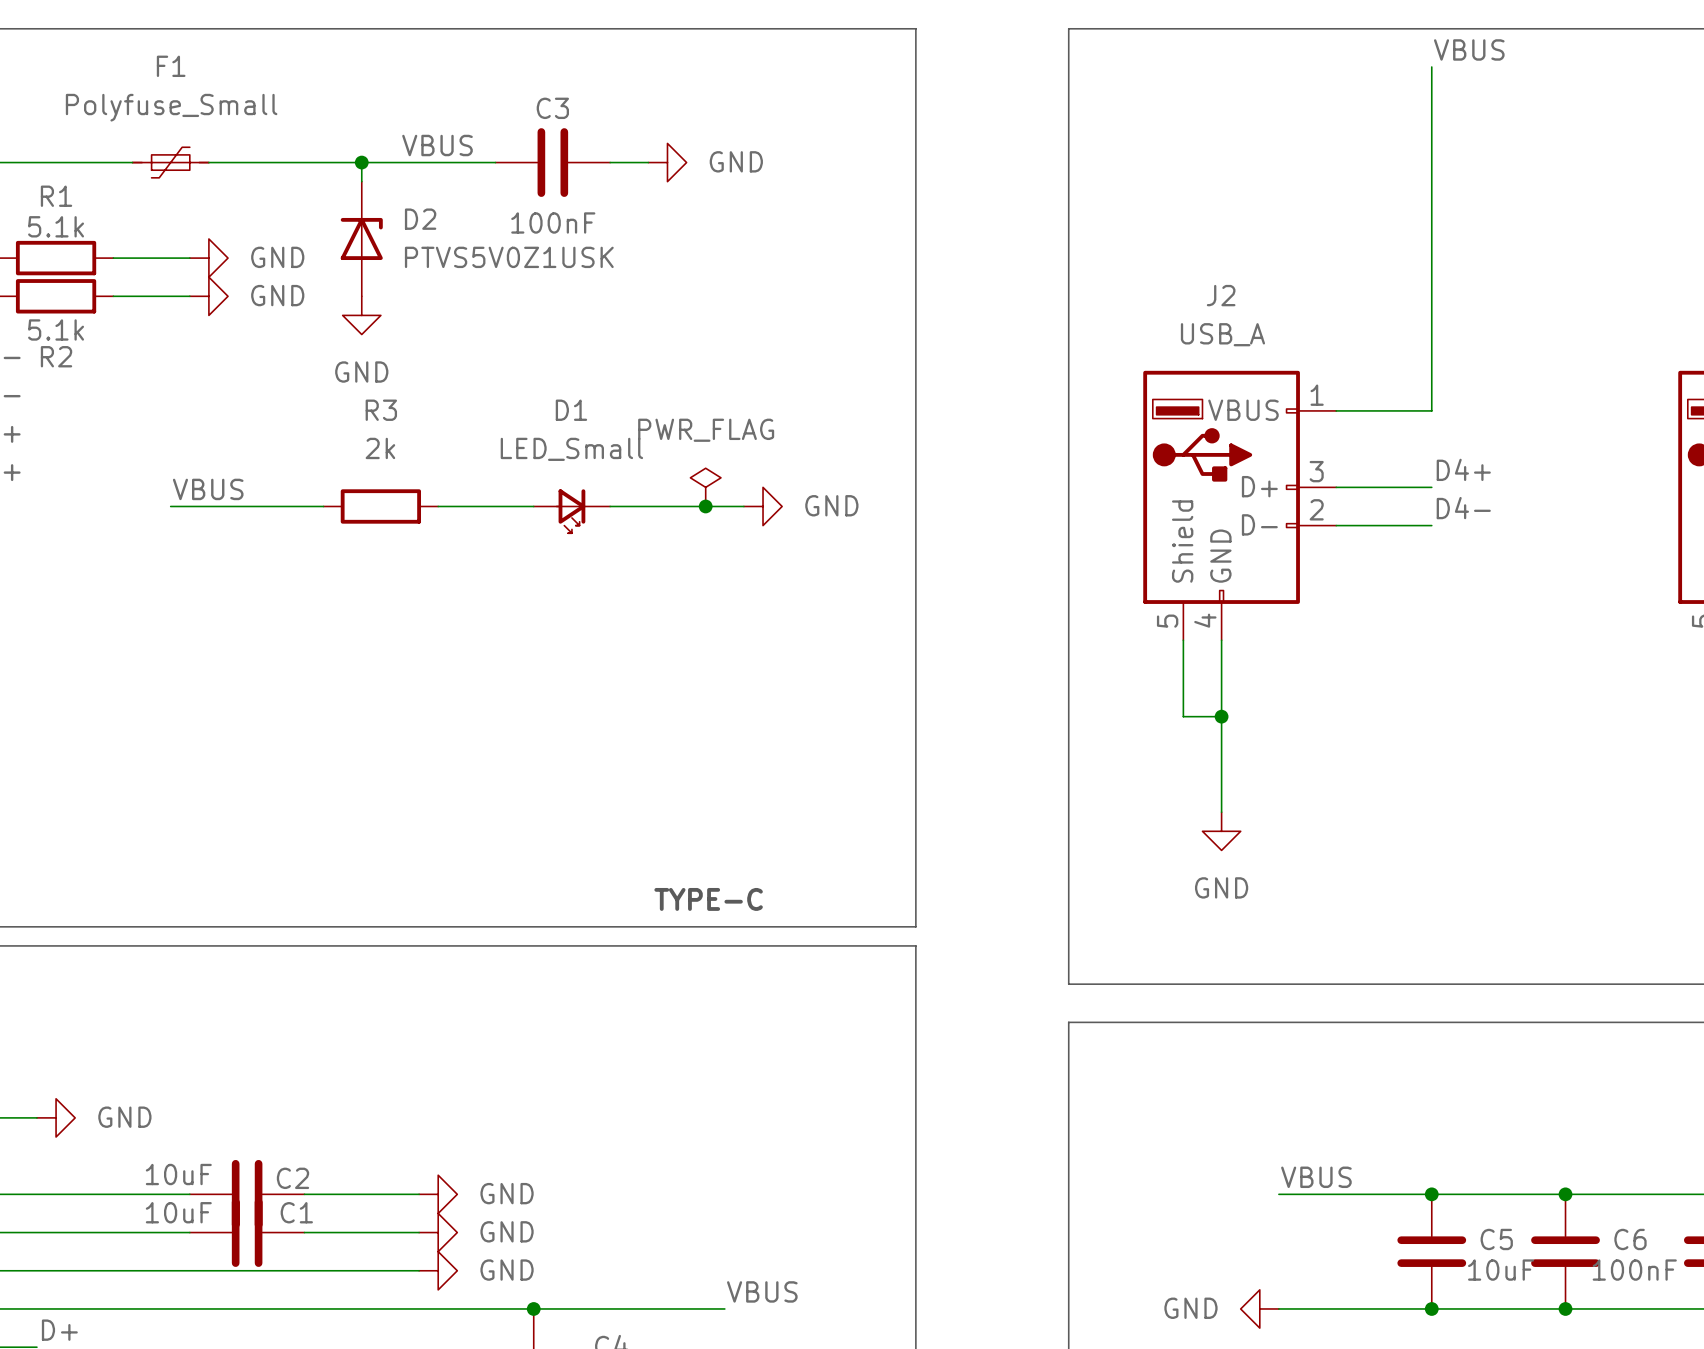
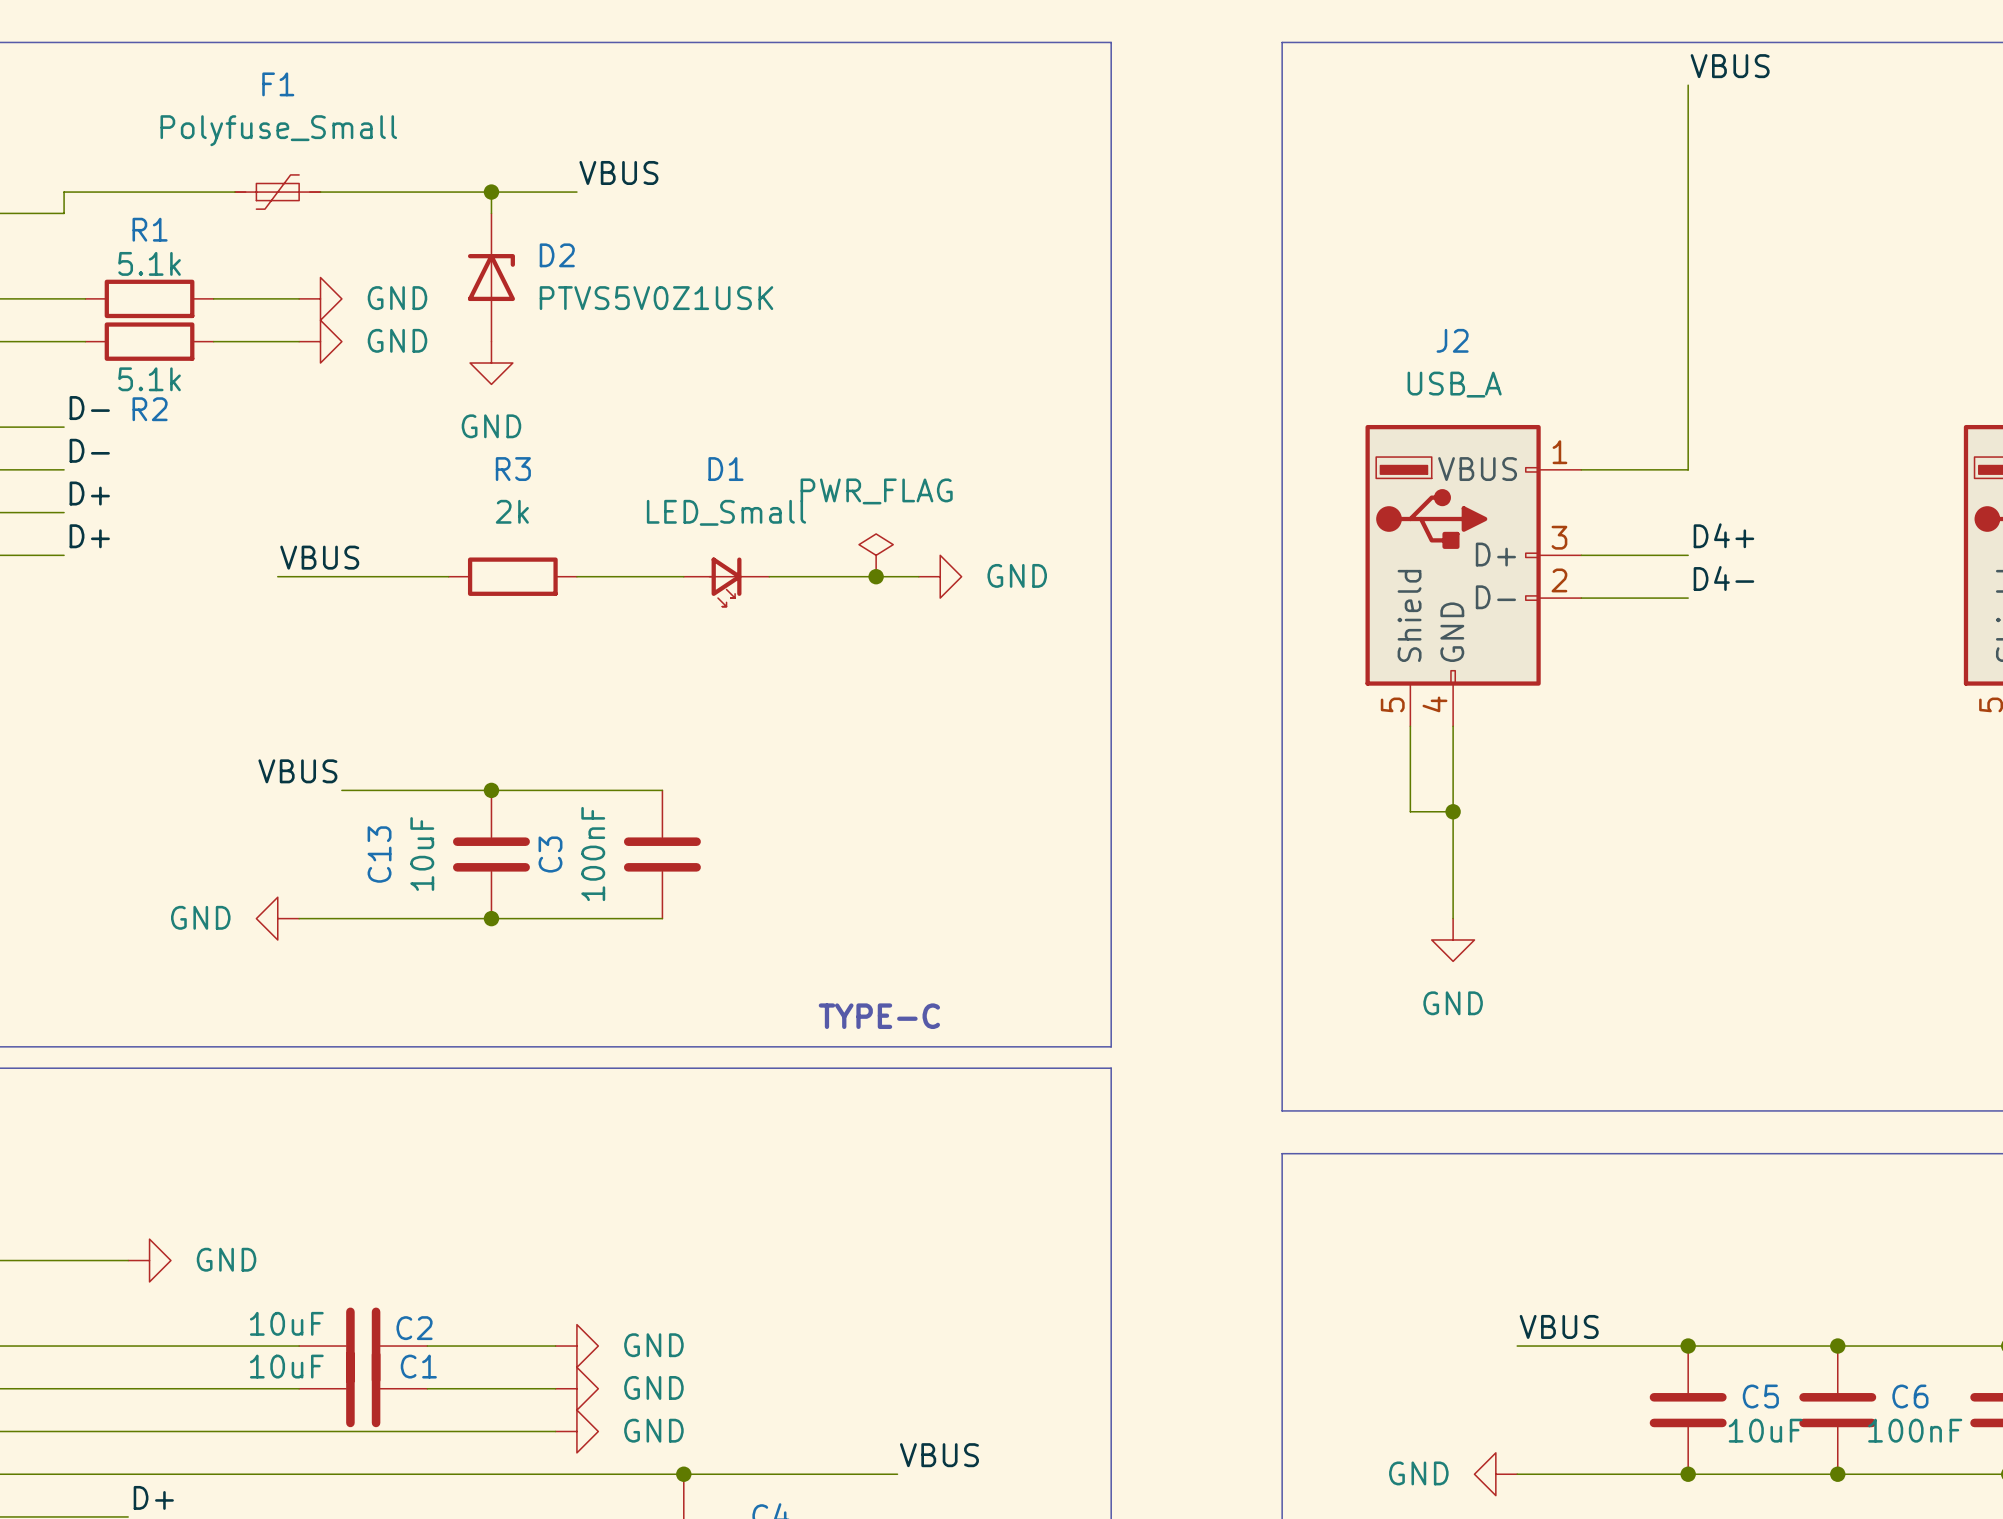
C3 name position: C3 (552, 108) -> C3 (550, 854)
label position: VBUS (437, 145) -> VBUS (618, 172)
wire: (438, 162) (495, 162) -> none
C3 rotation: 0° (552, 162) -> 90° clockwise (662, 854)
C3 position: (552, 162) -> (662, 854)
wire: (610, 162) (648, 162) -> none
power symbol: GND (667, 162) -> none
label: none -> VBUS (297, 771)
wire: none -> (341, 790) (662, 790)
junction: none -> (491, 790)
C13: none -> 10uF (491, 854)
power symbol: none -> GND (277, 918)
wire: none -> (299, 918) (662, 918)
junction: none -> (491, 918)

